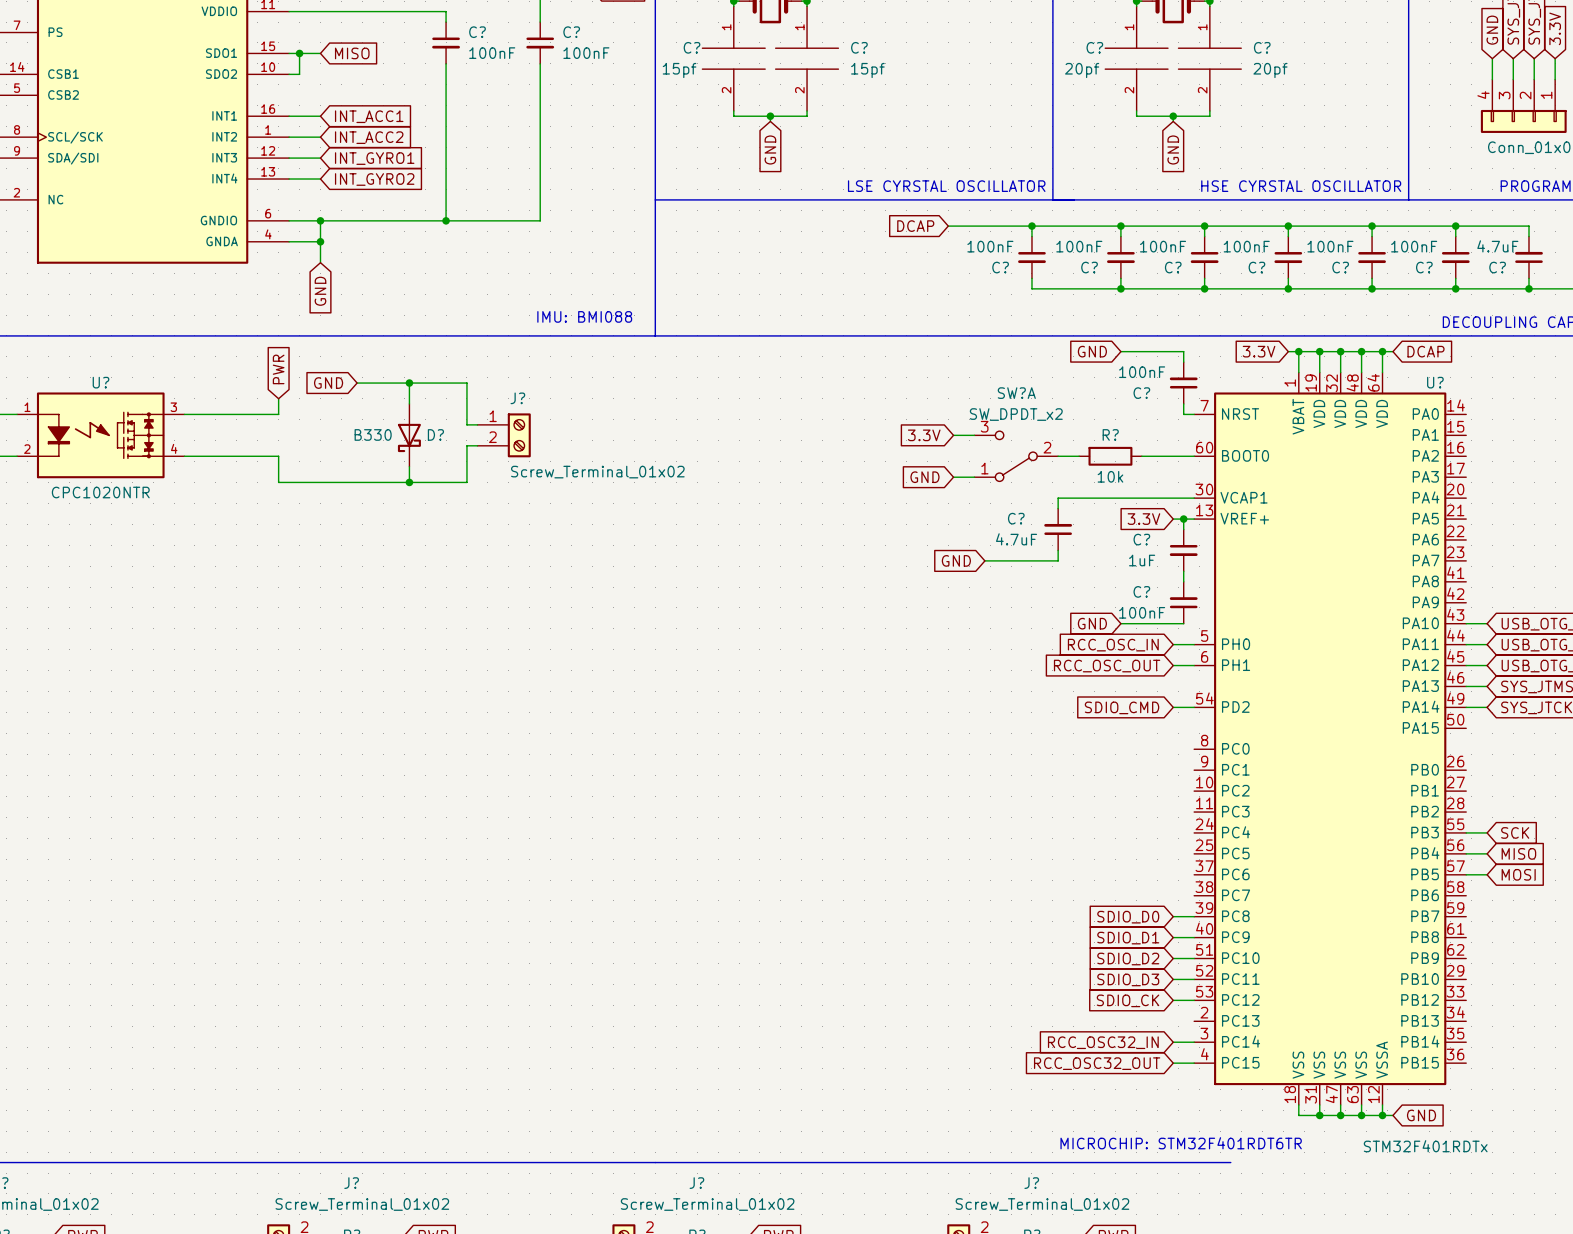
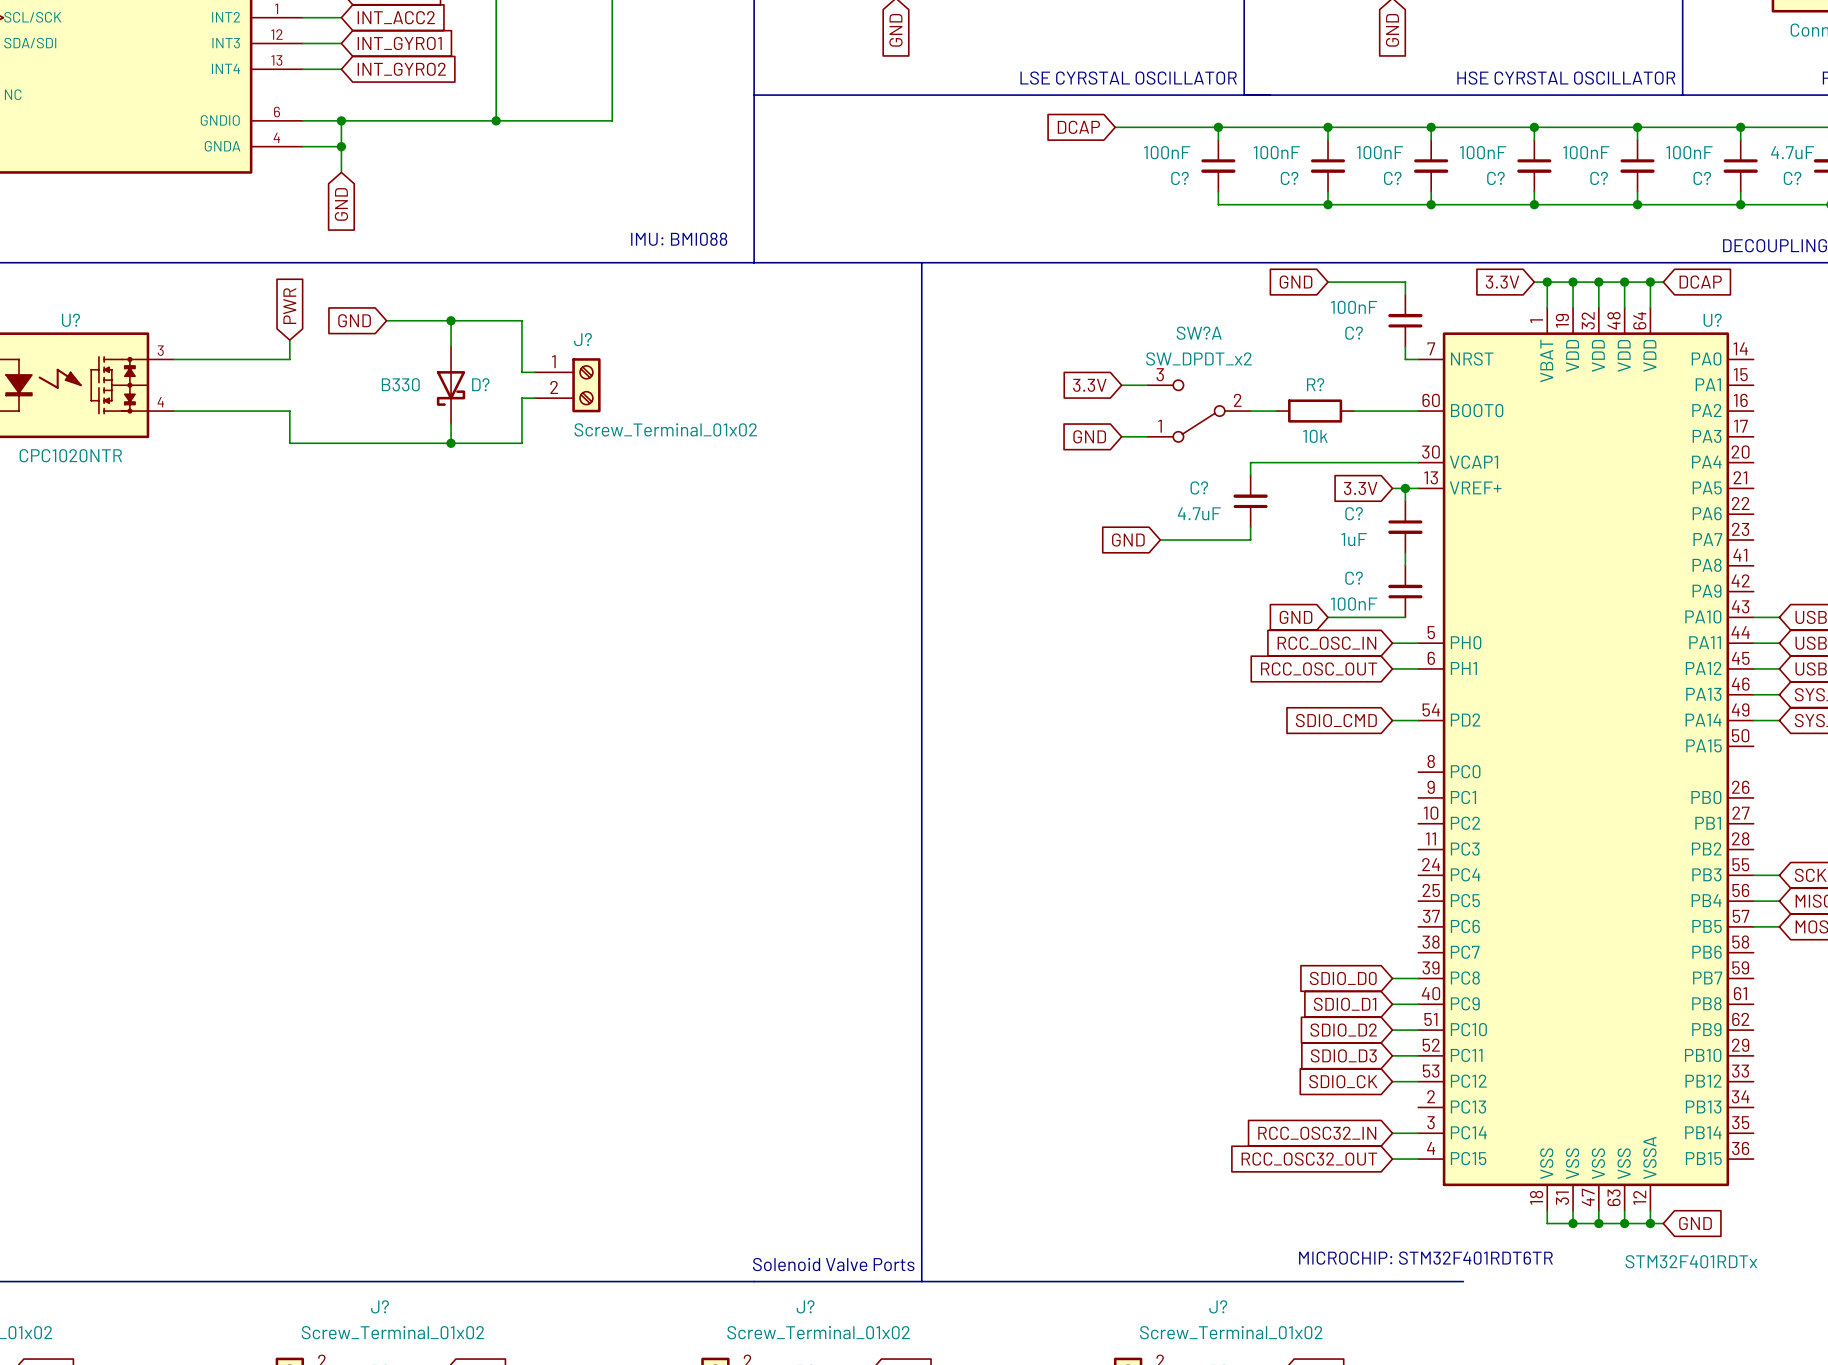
line: none -> (921, 262) (921, 1281)
text: none -> Solenoid Valve Ports (833, 1264)

